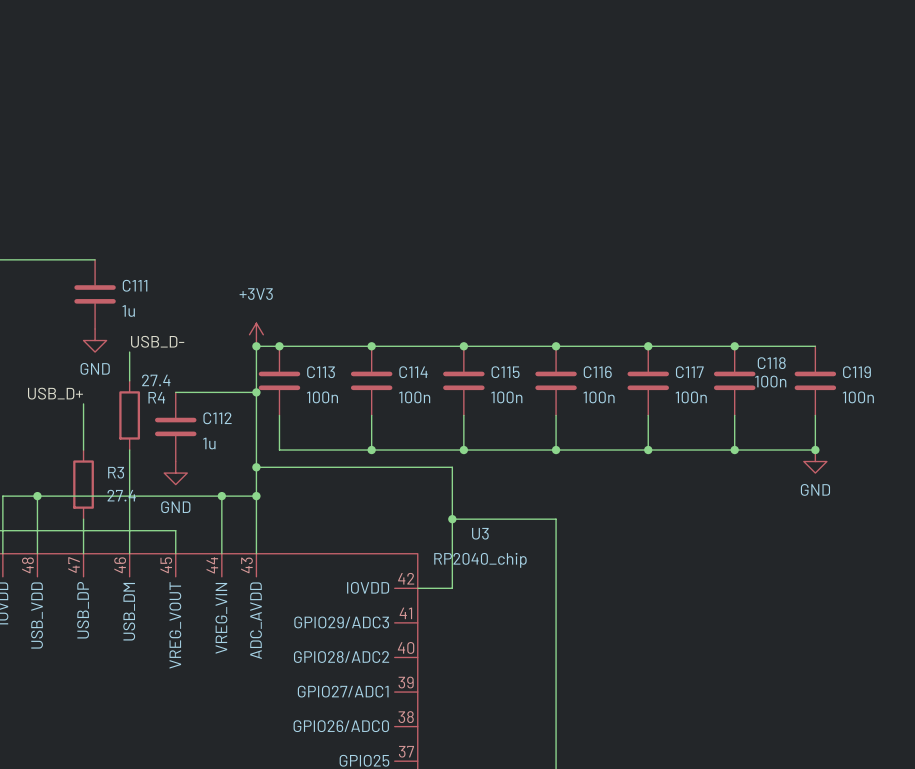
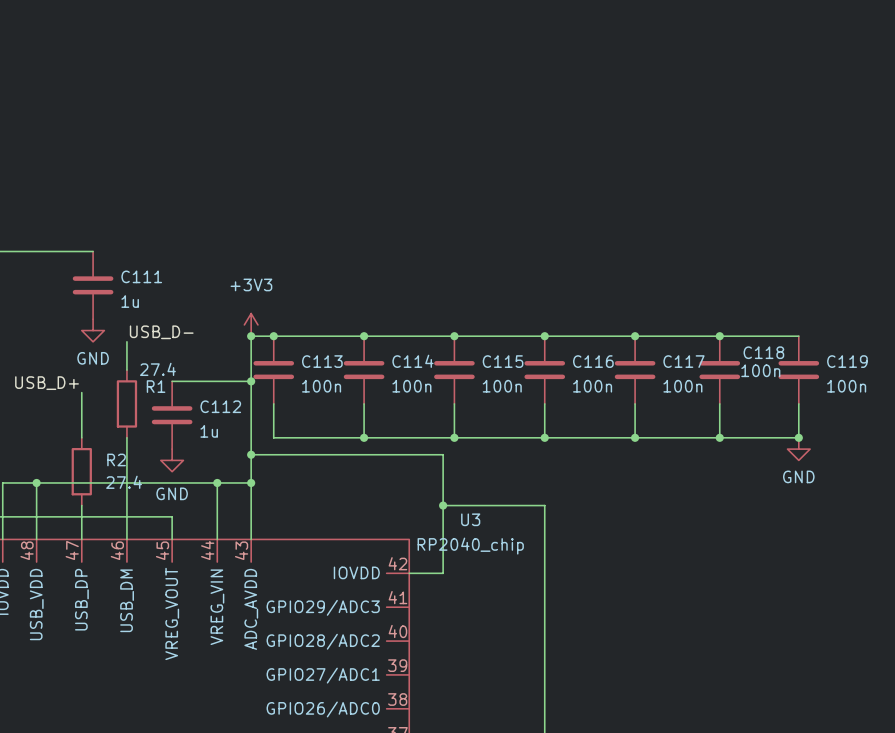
R4 name: R4 (156, 397) -> R1 (156, 386)
R3 name: R3 (116, 472) -> R2 (116, 459)

